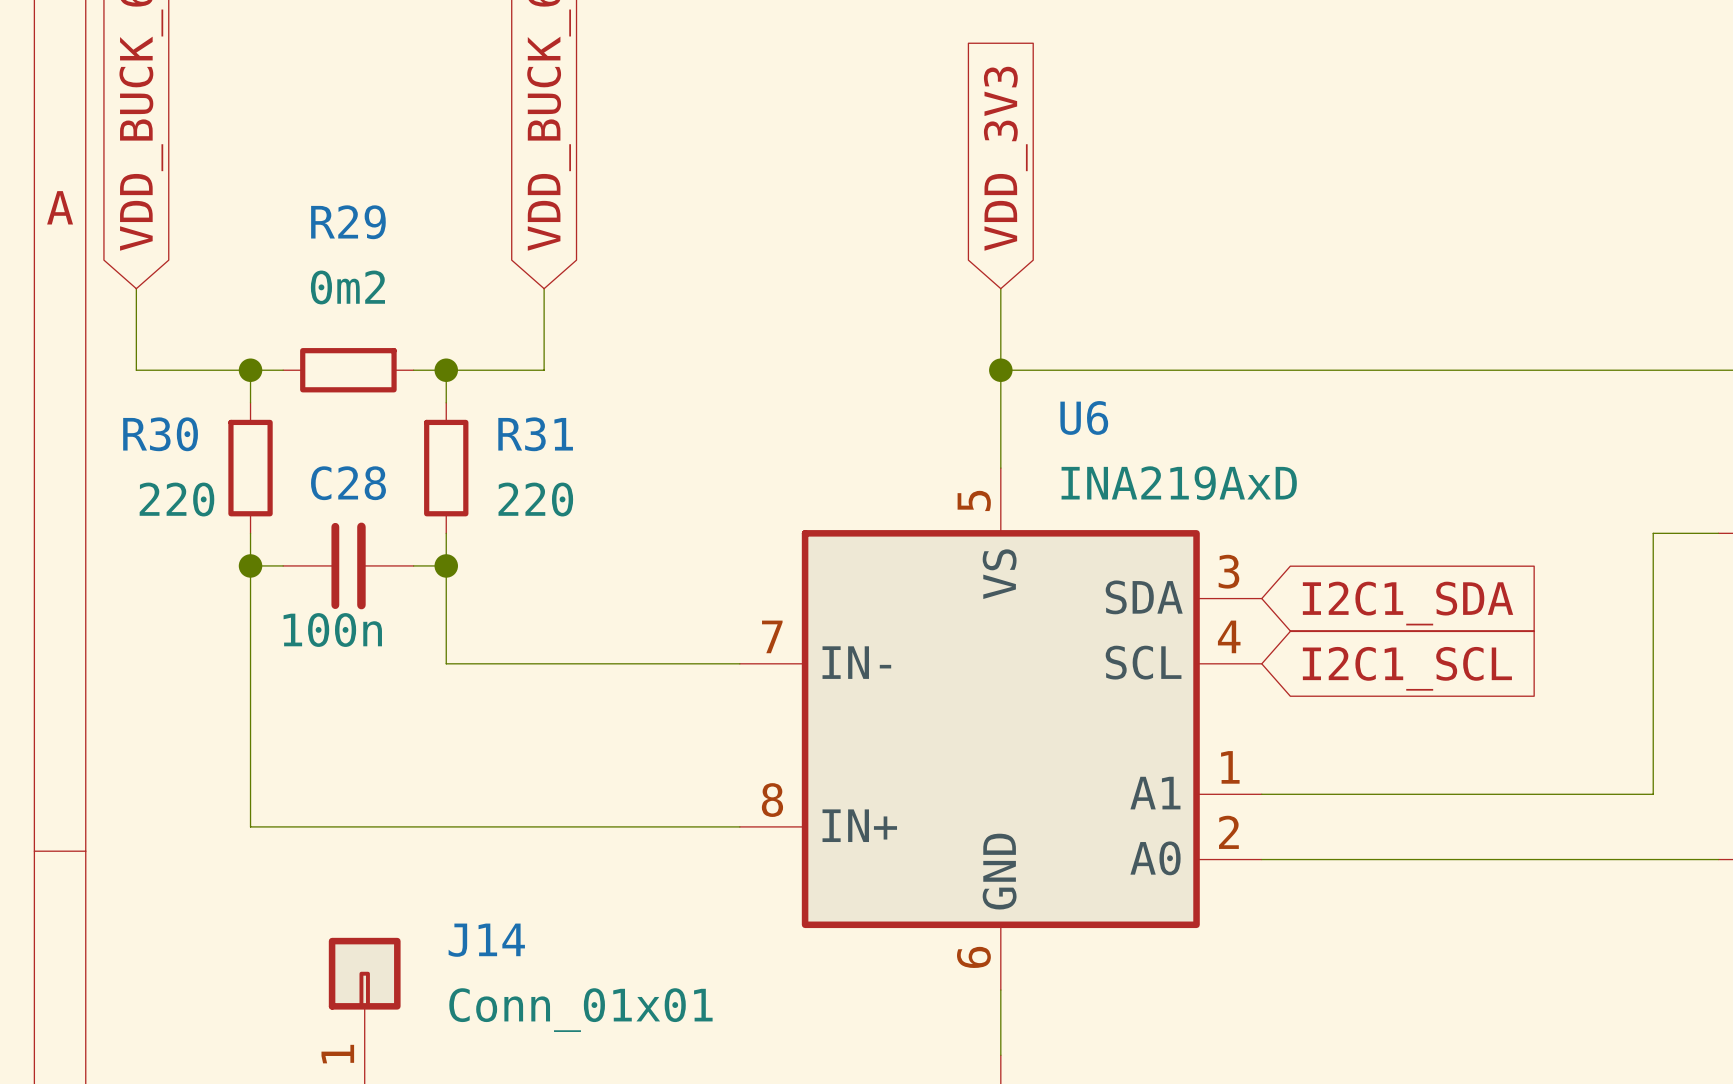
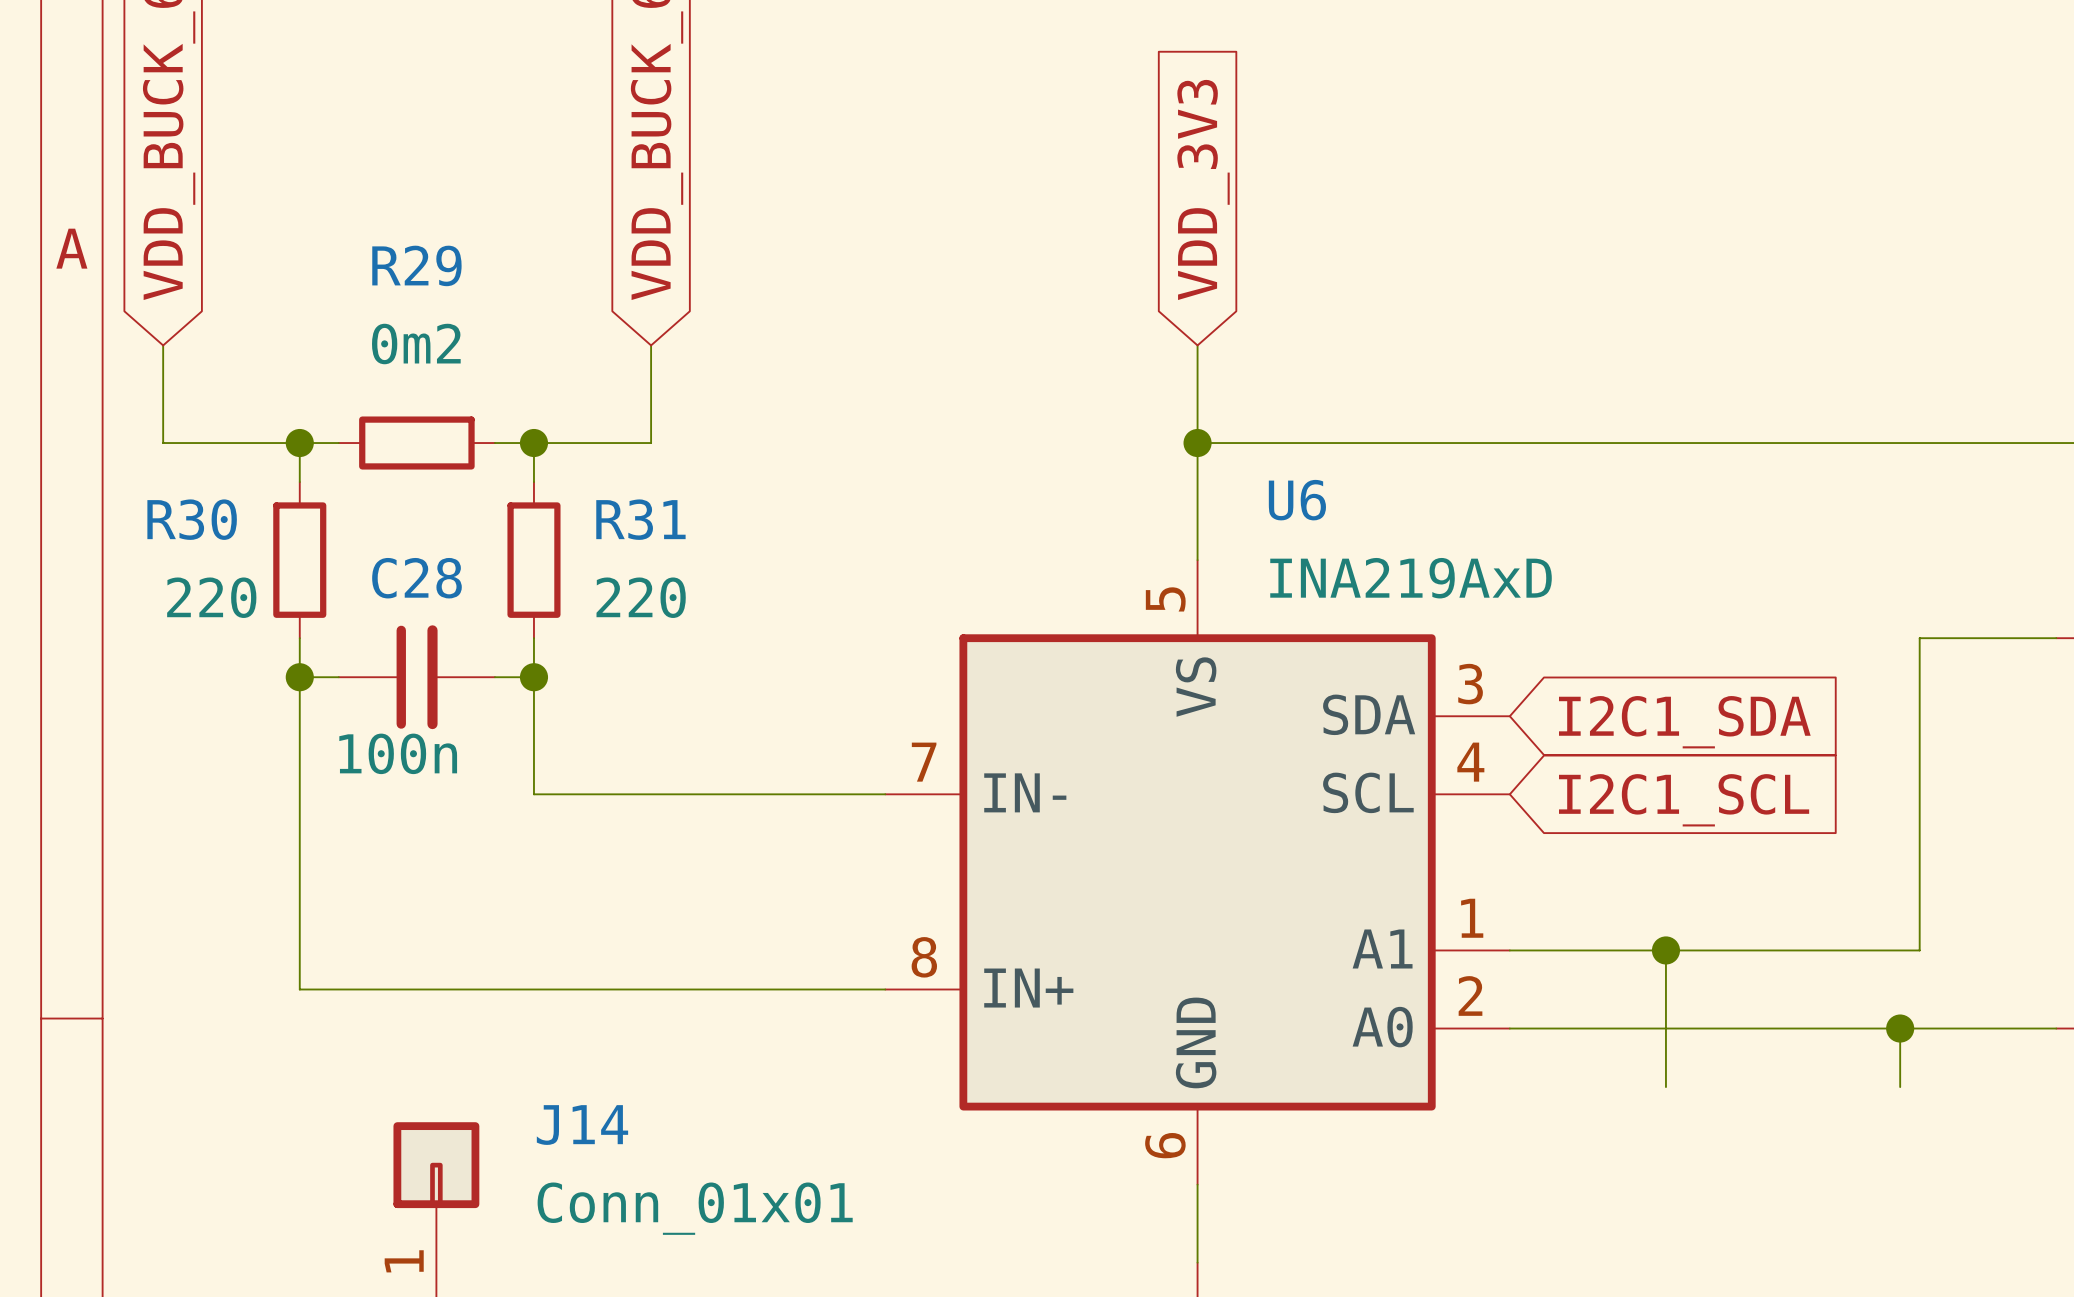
wire: (1653, 533) (1653, 794) (1604, 794) -> (1978, 638) (1919, 638) (1919, 950)
wire: none -> (1665, 950) (1665, 1087)
junction: none -> (1665, 950)
wire: none -> (1900, 1028) (1900, 1087)
junction: none -> (1900, 1028)

